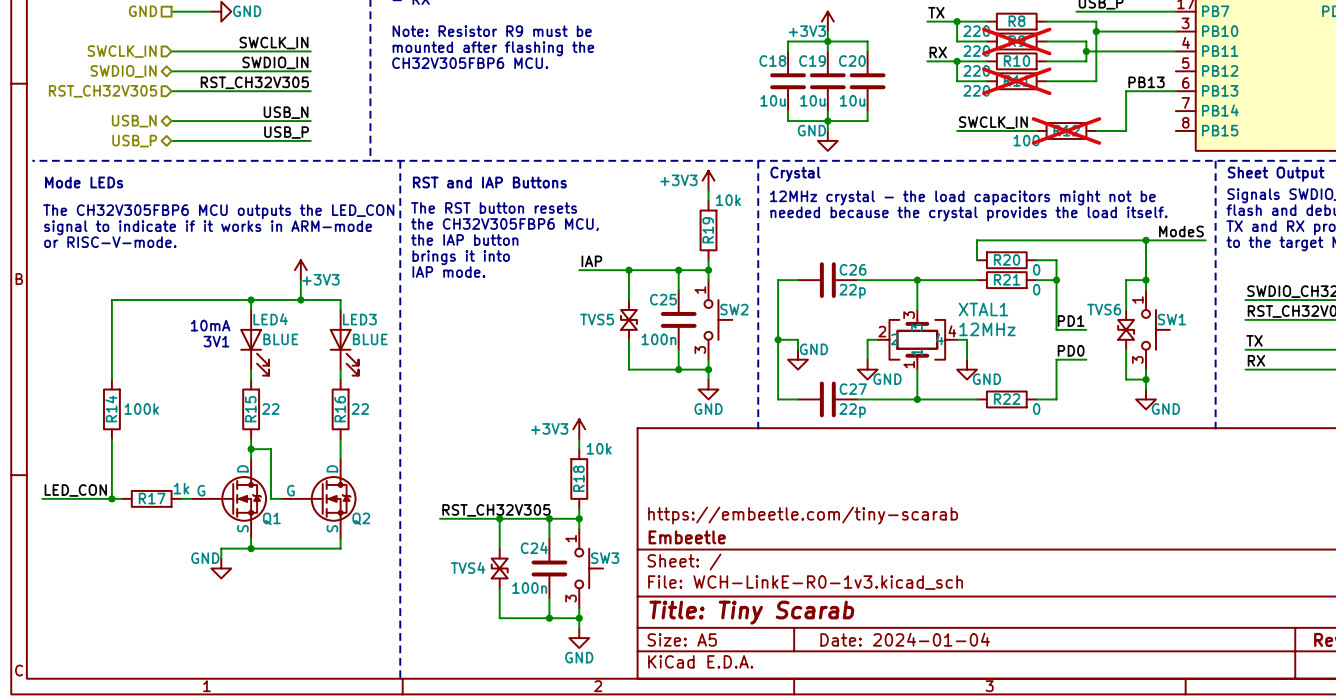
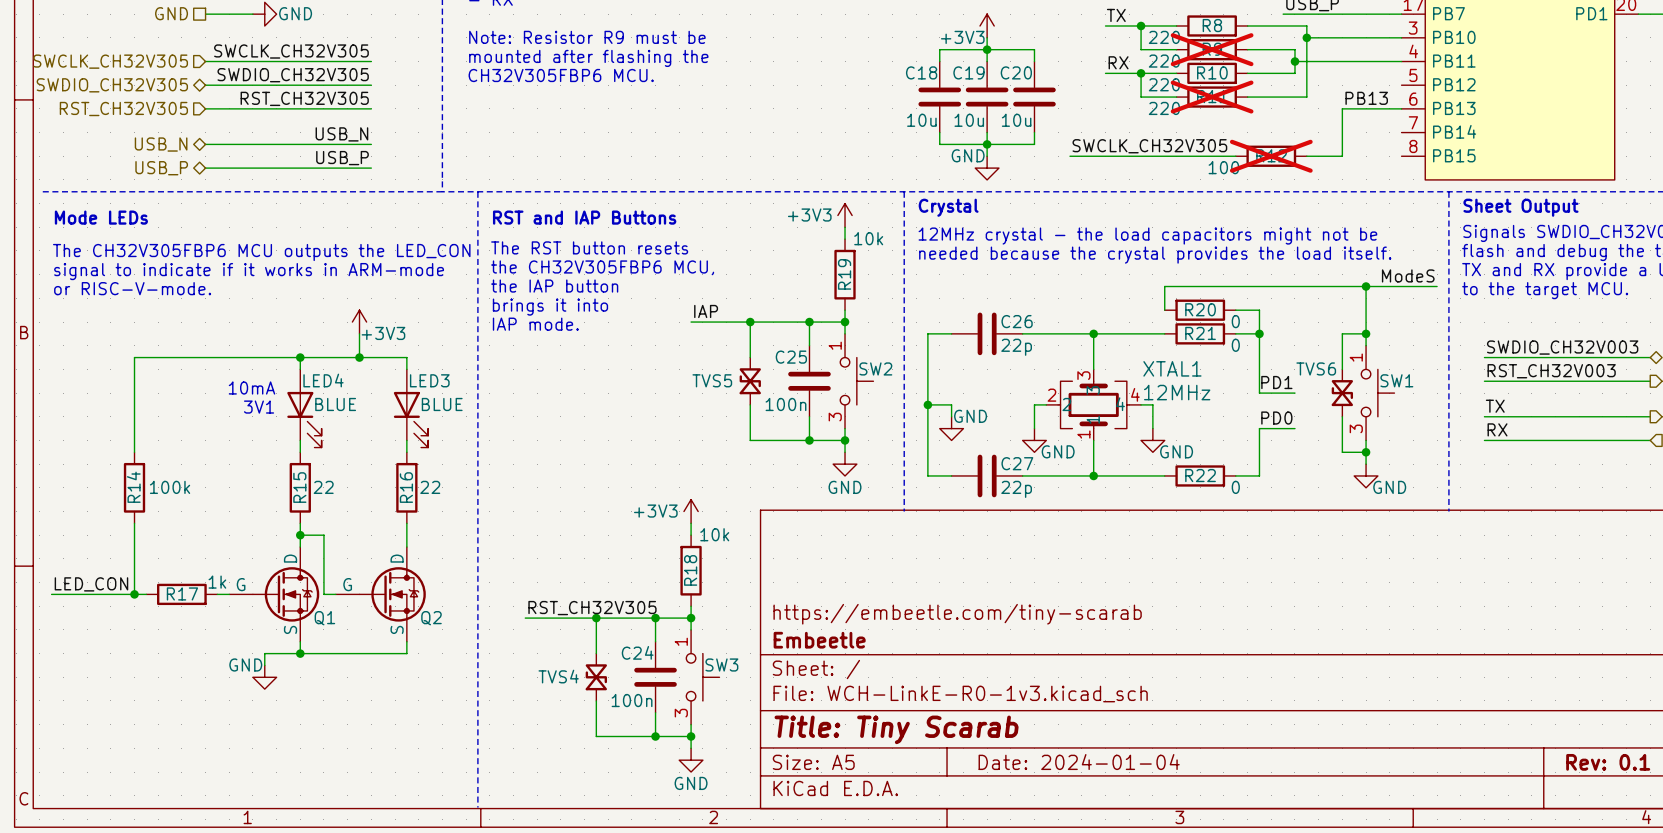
label: SWCLK_IN (274, 43) -> SWCLK_CH32V305 (291, 51)
hierarchical label: SWCLK_IN (122, 51) -> SWCLK_CH32V305 (110, 61)
label: SWDIO_IN (275, 62) -> SWDIO_CH32V305 (293, 75)
hierarchical label: SWDIO_IN (123, 71) -> SWDIO_CH32V305 (112, 85)
label: none -> SWCLK_CH32V305 (1149, 146)
label: SWCLK_IN (993, 122) -> none
wire: none -> (1070, 156) (1141, 156)

